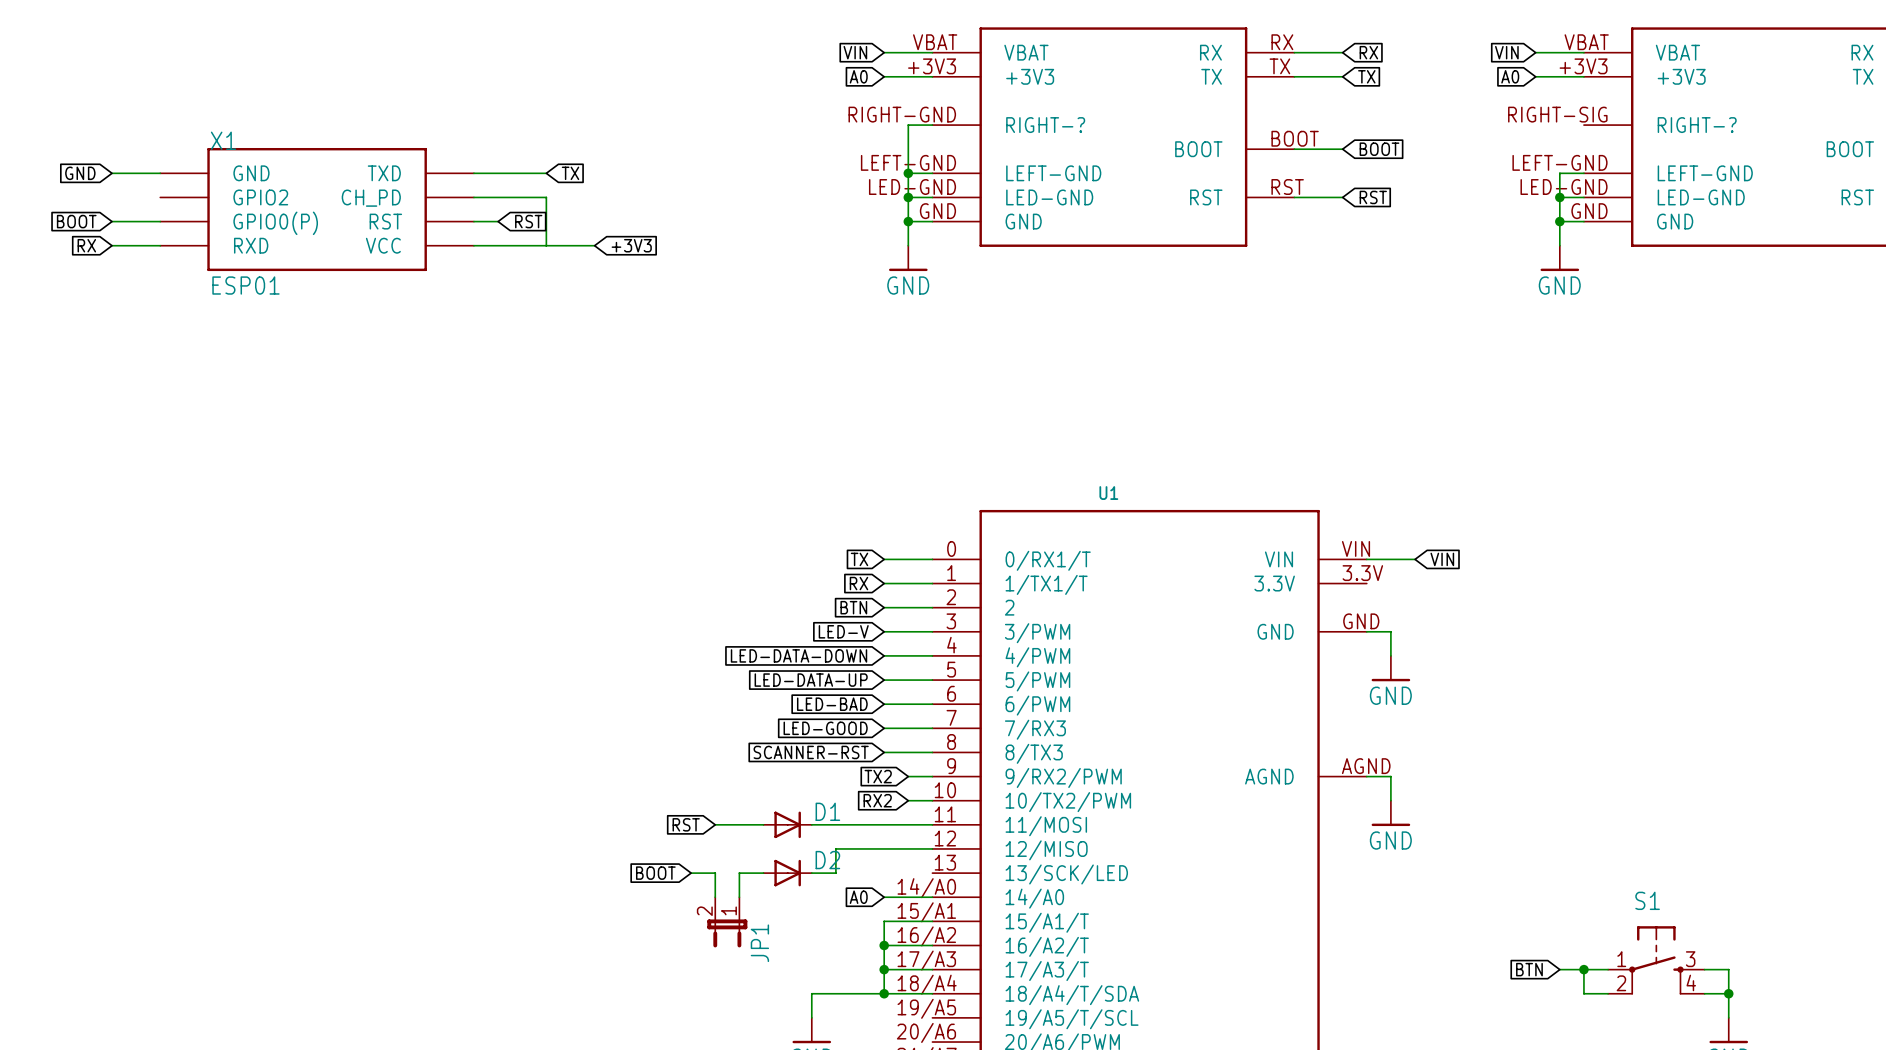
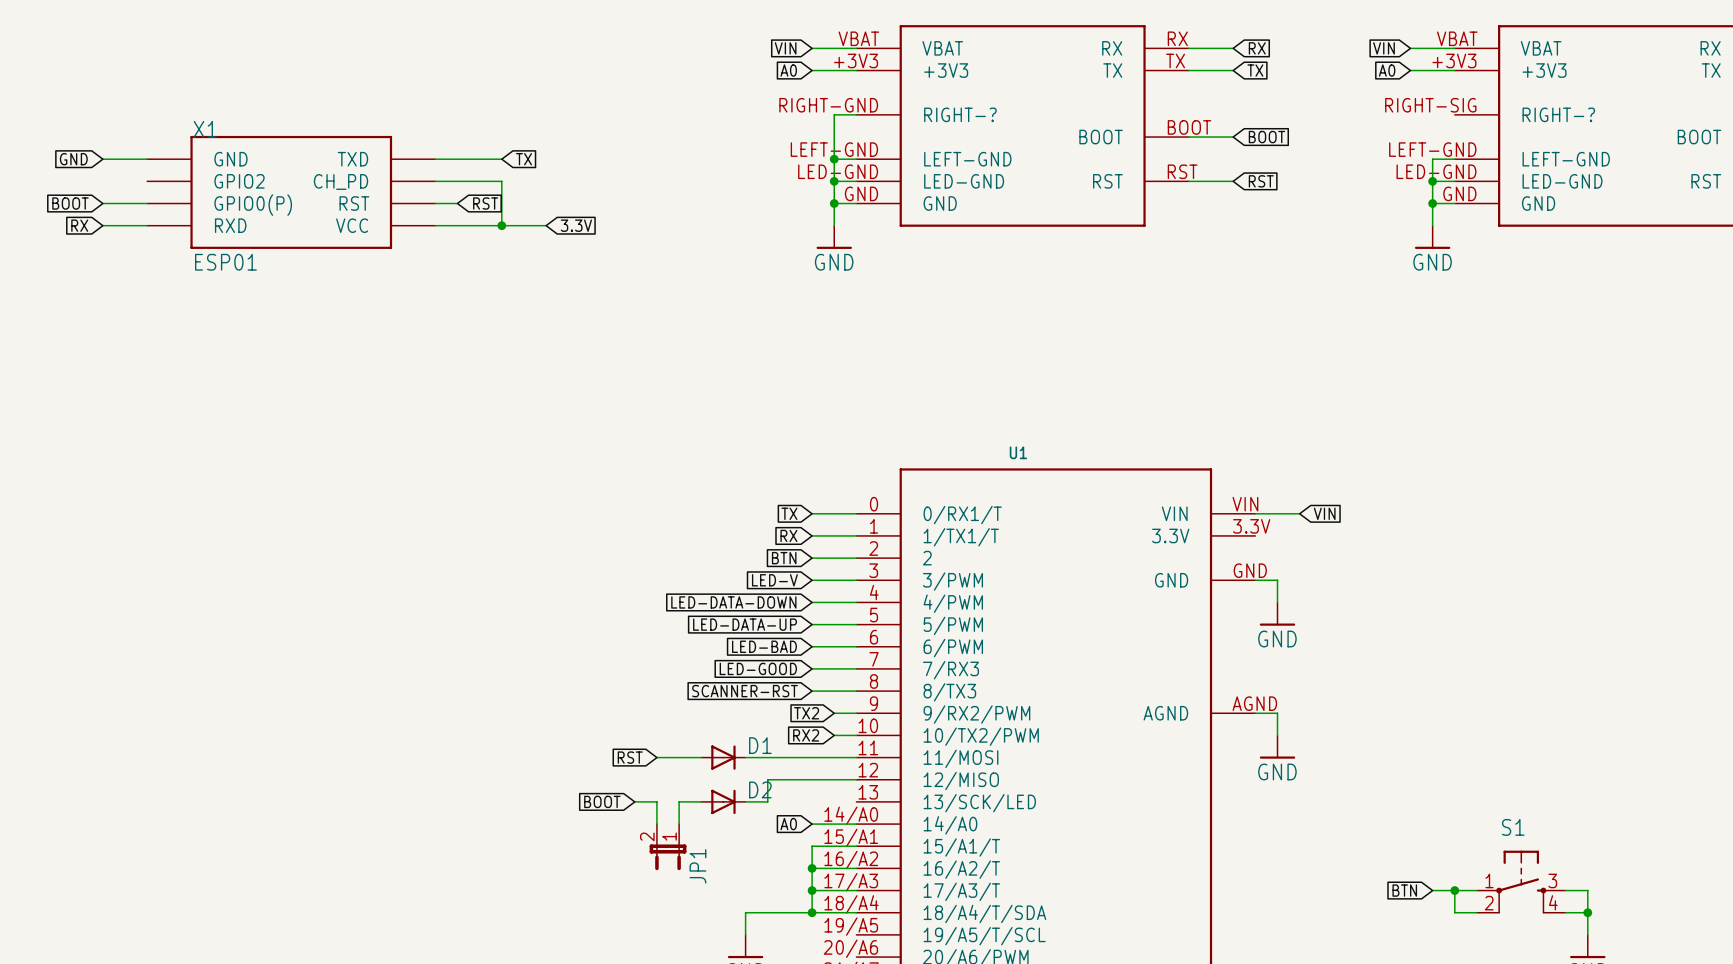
junction: none -> (501, 225)
global label: +3V3 (631, 245) -> 3.3V (576, 225)

